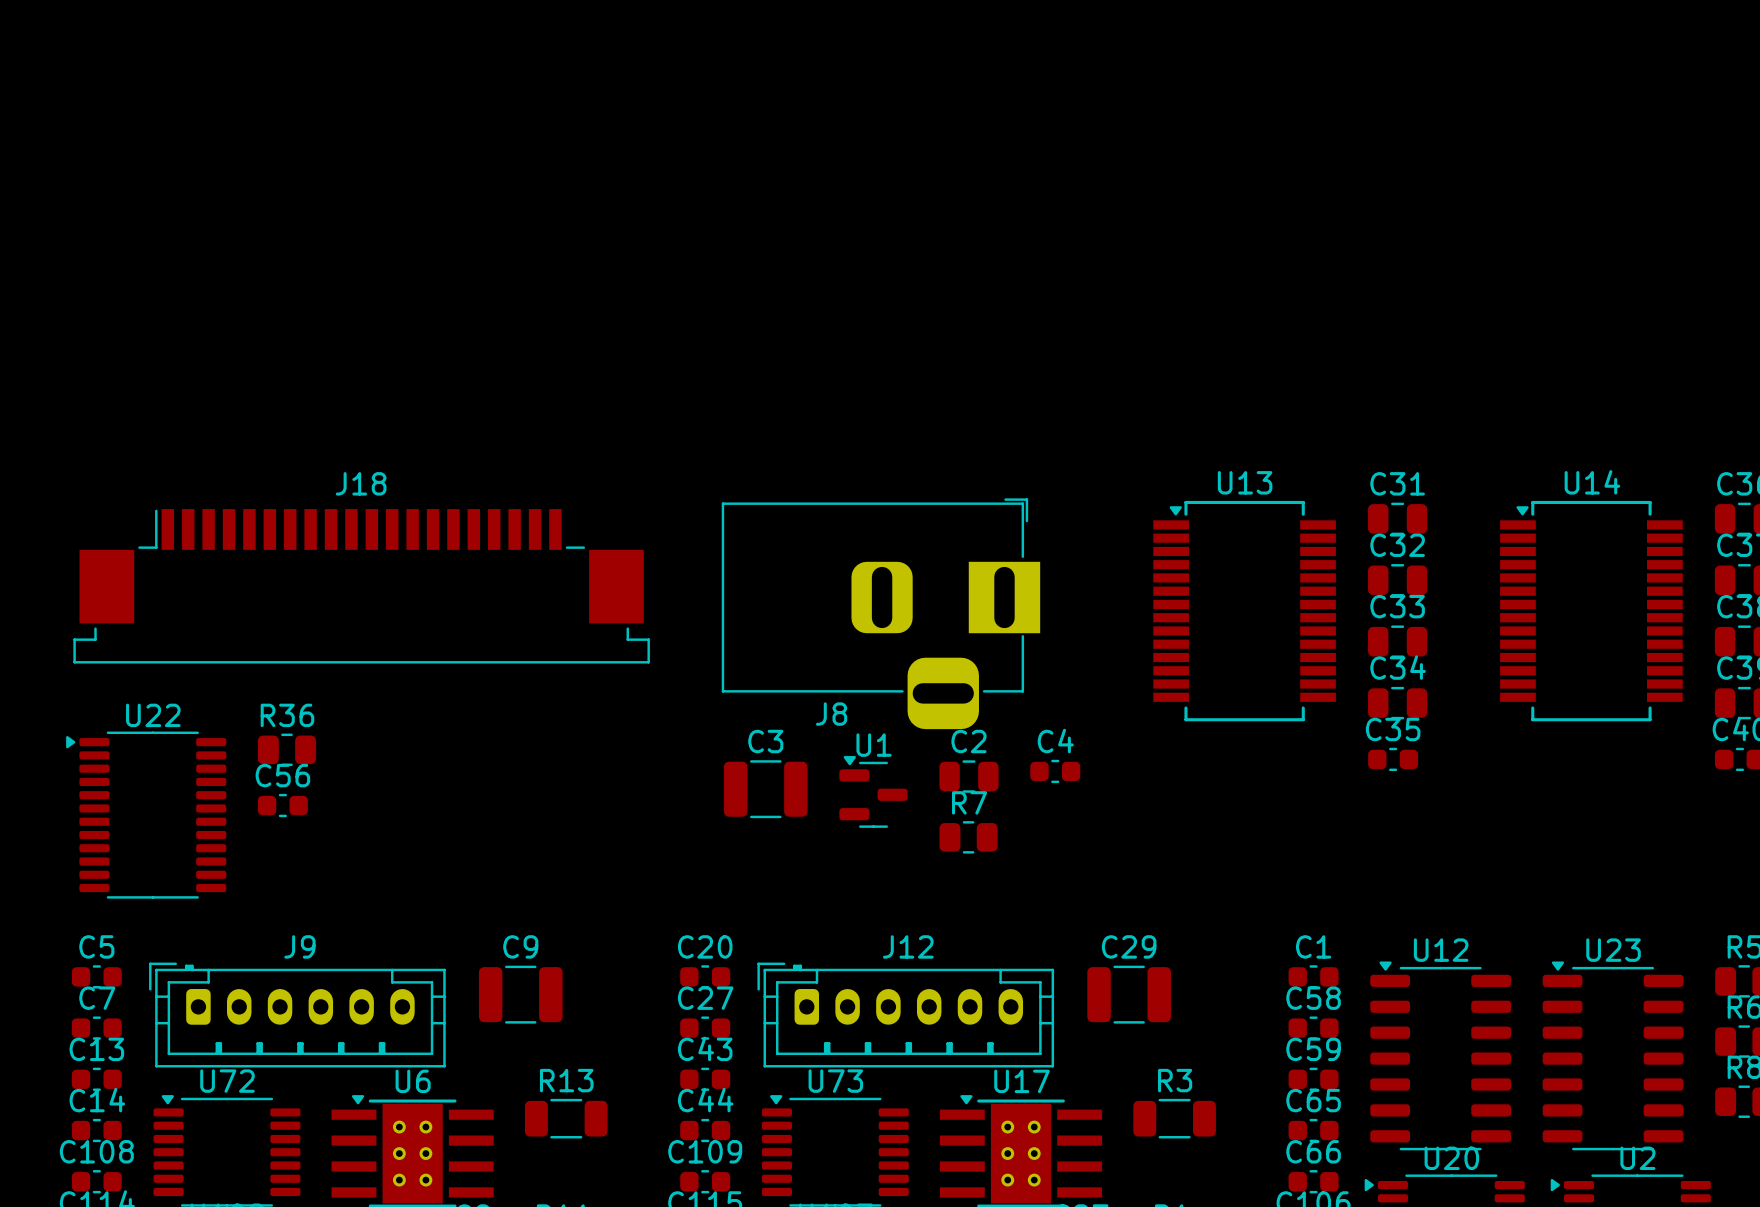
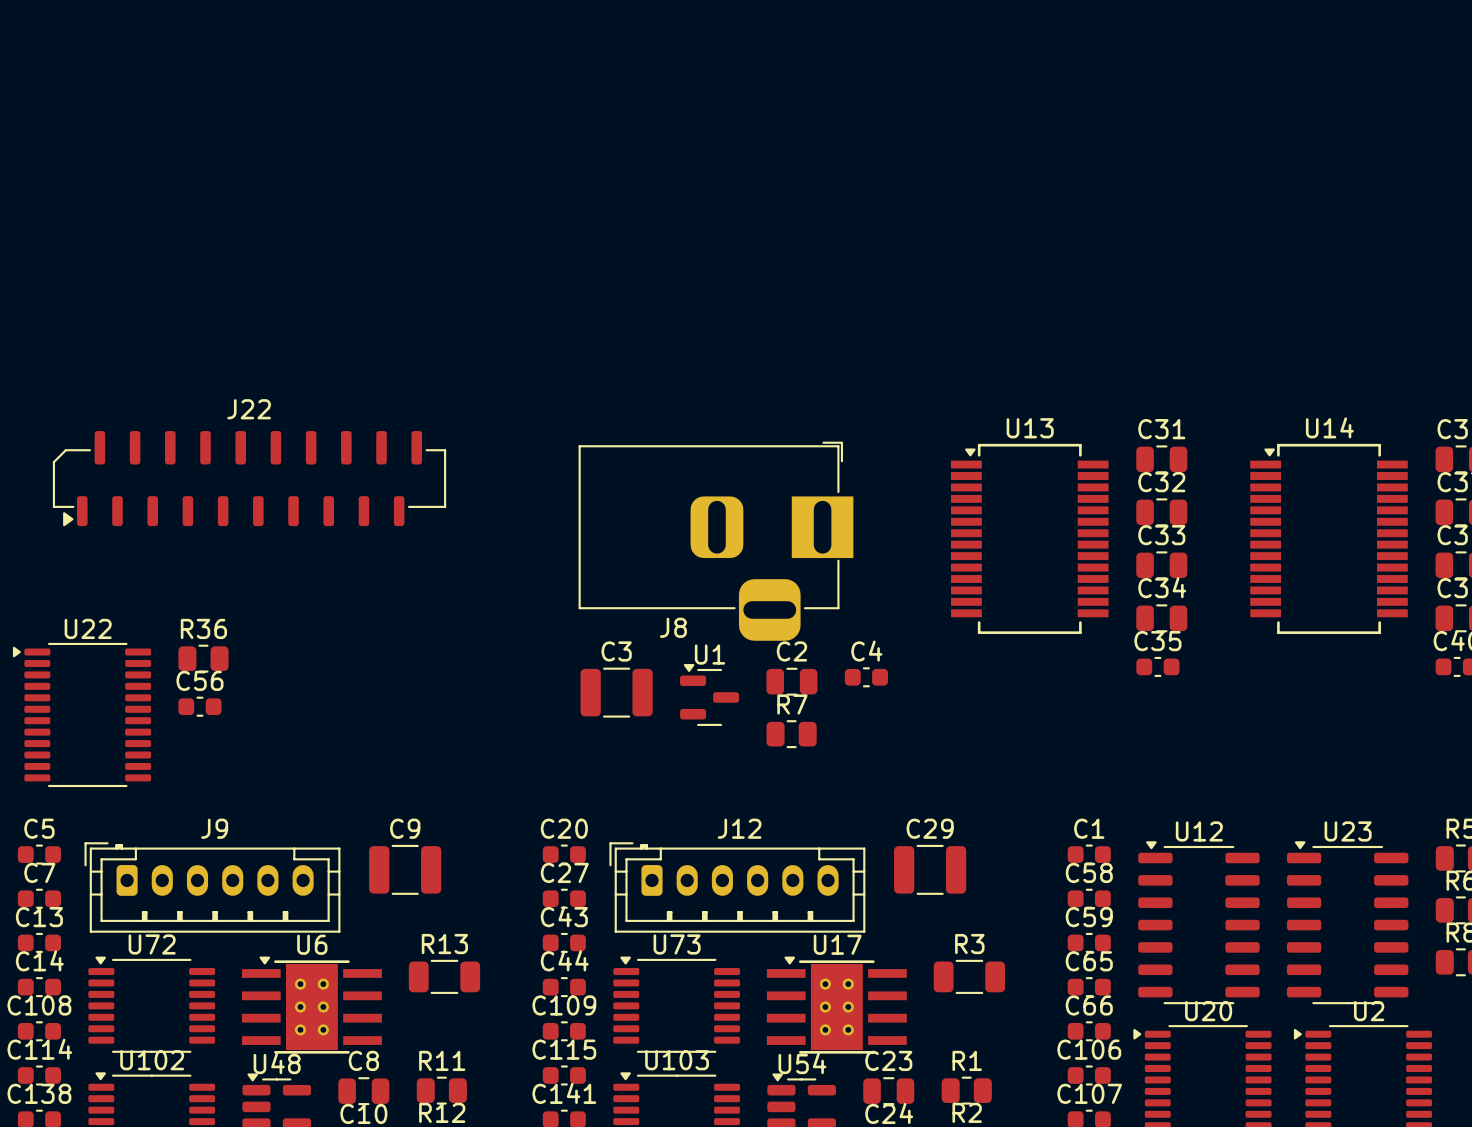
J22: none -> (249, 478)
J18: (361, 586) -> none

